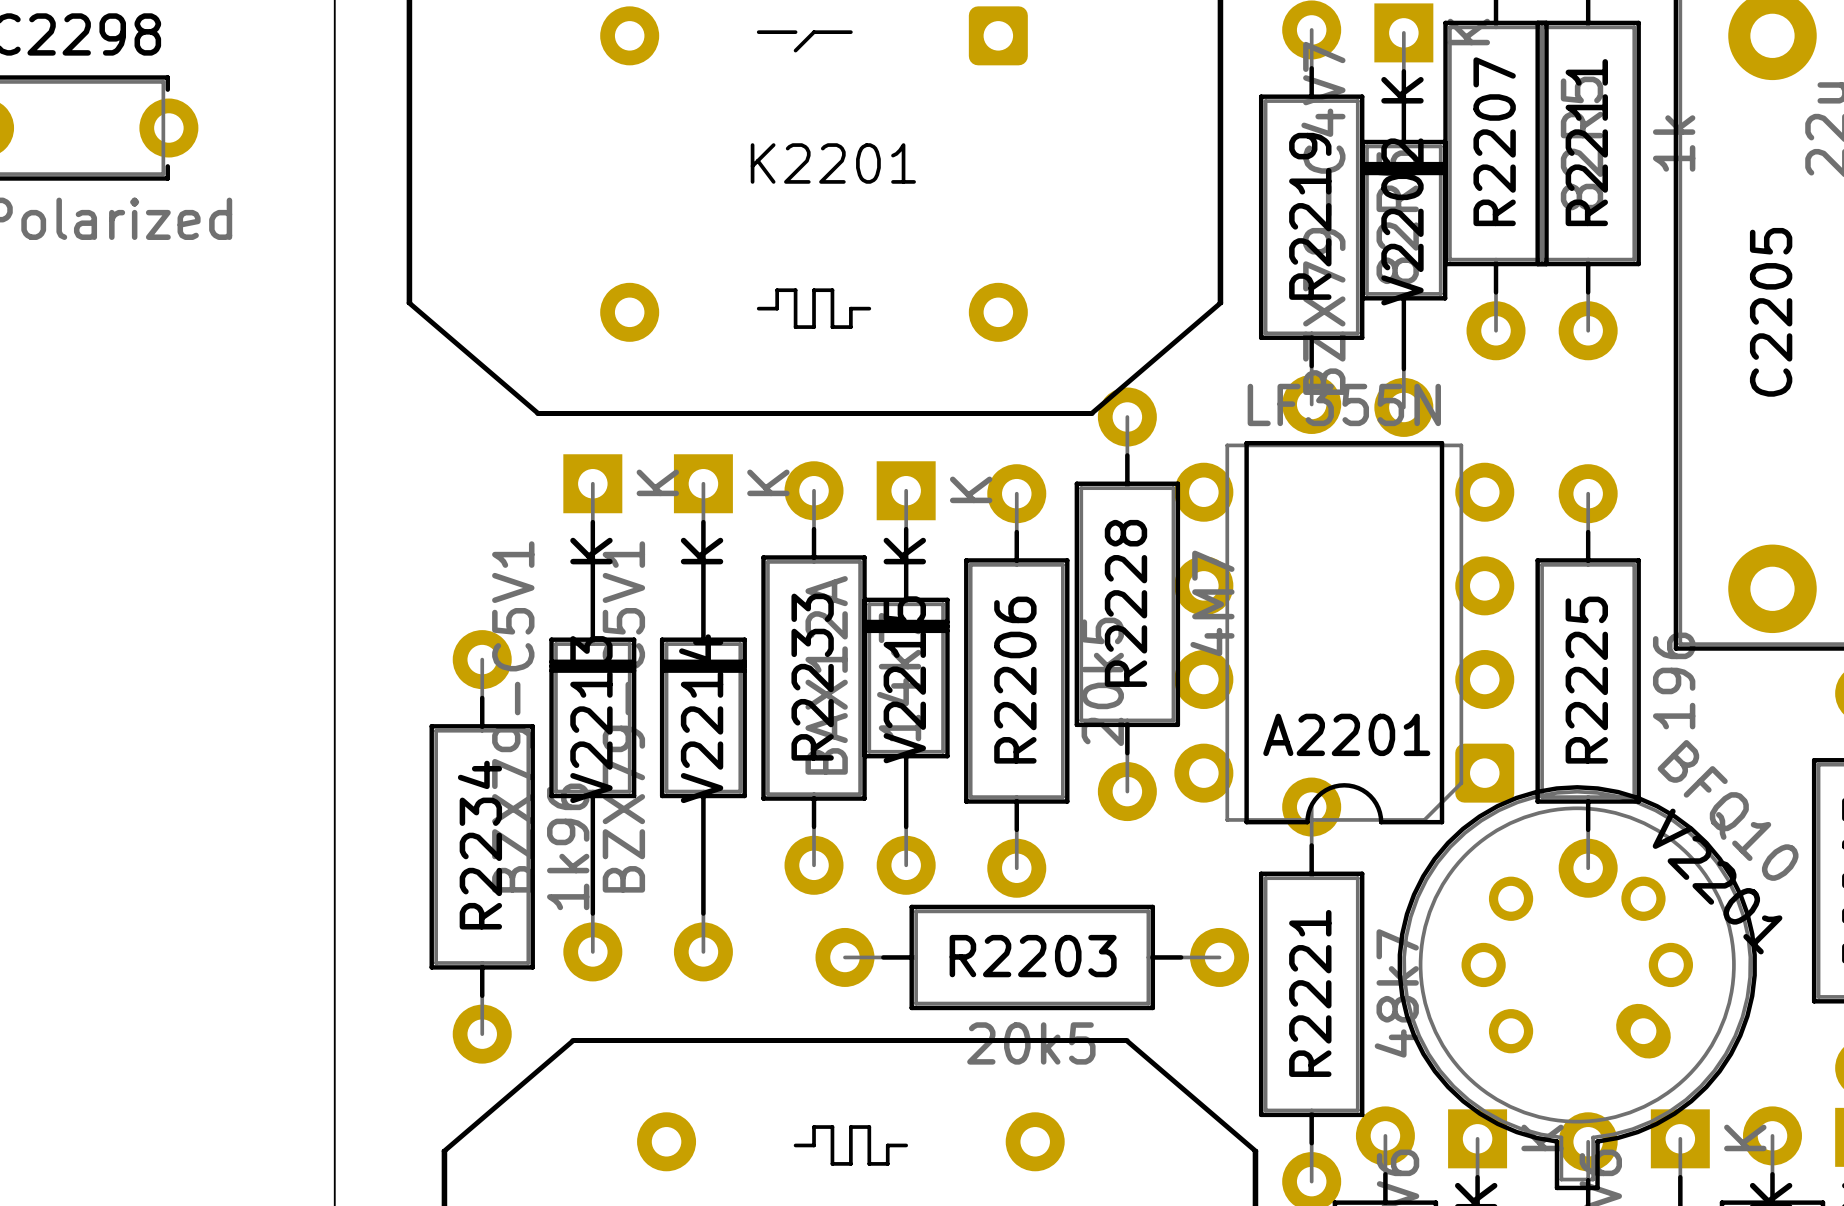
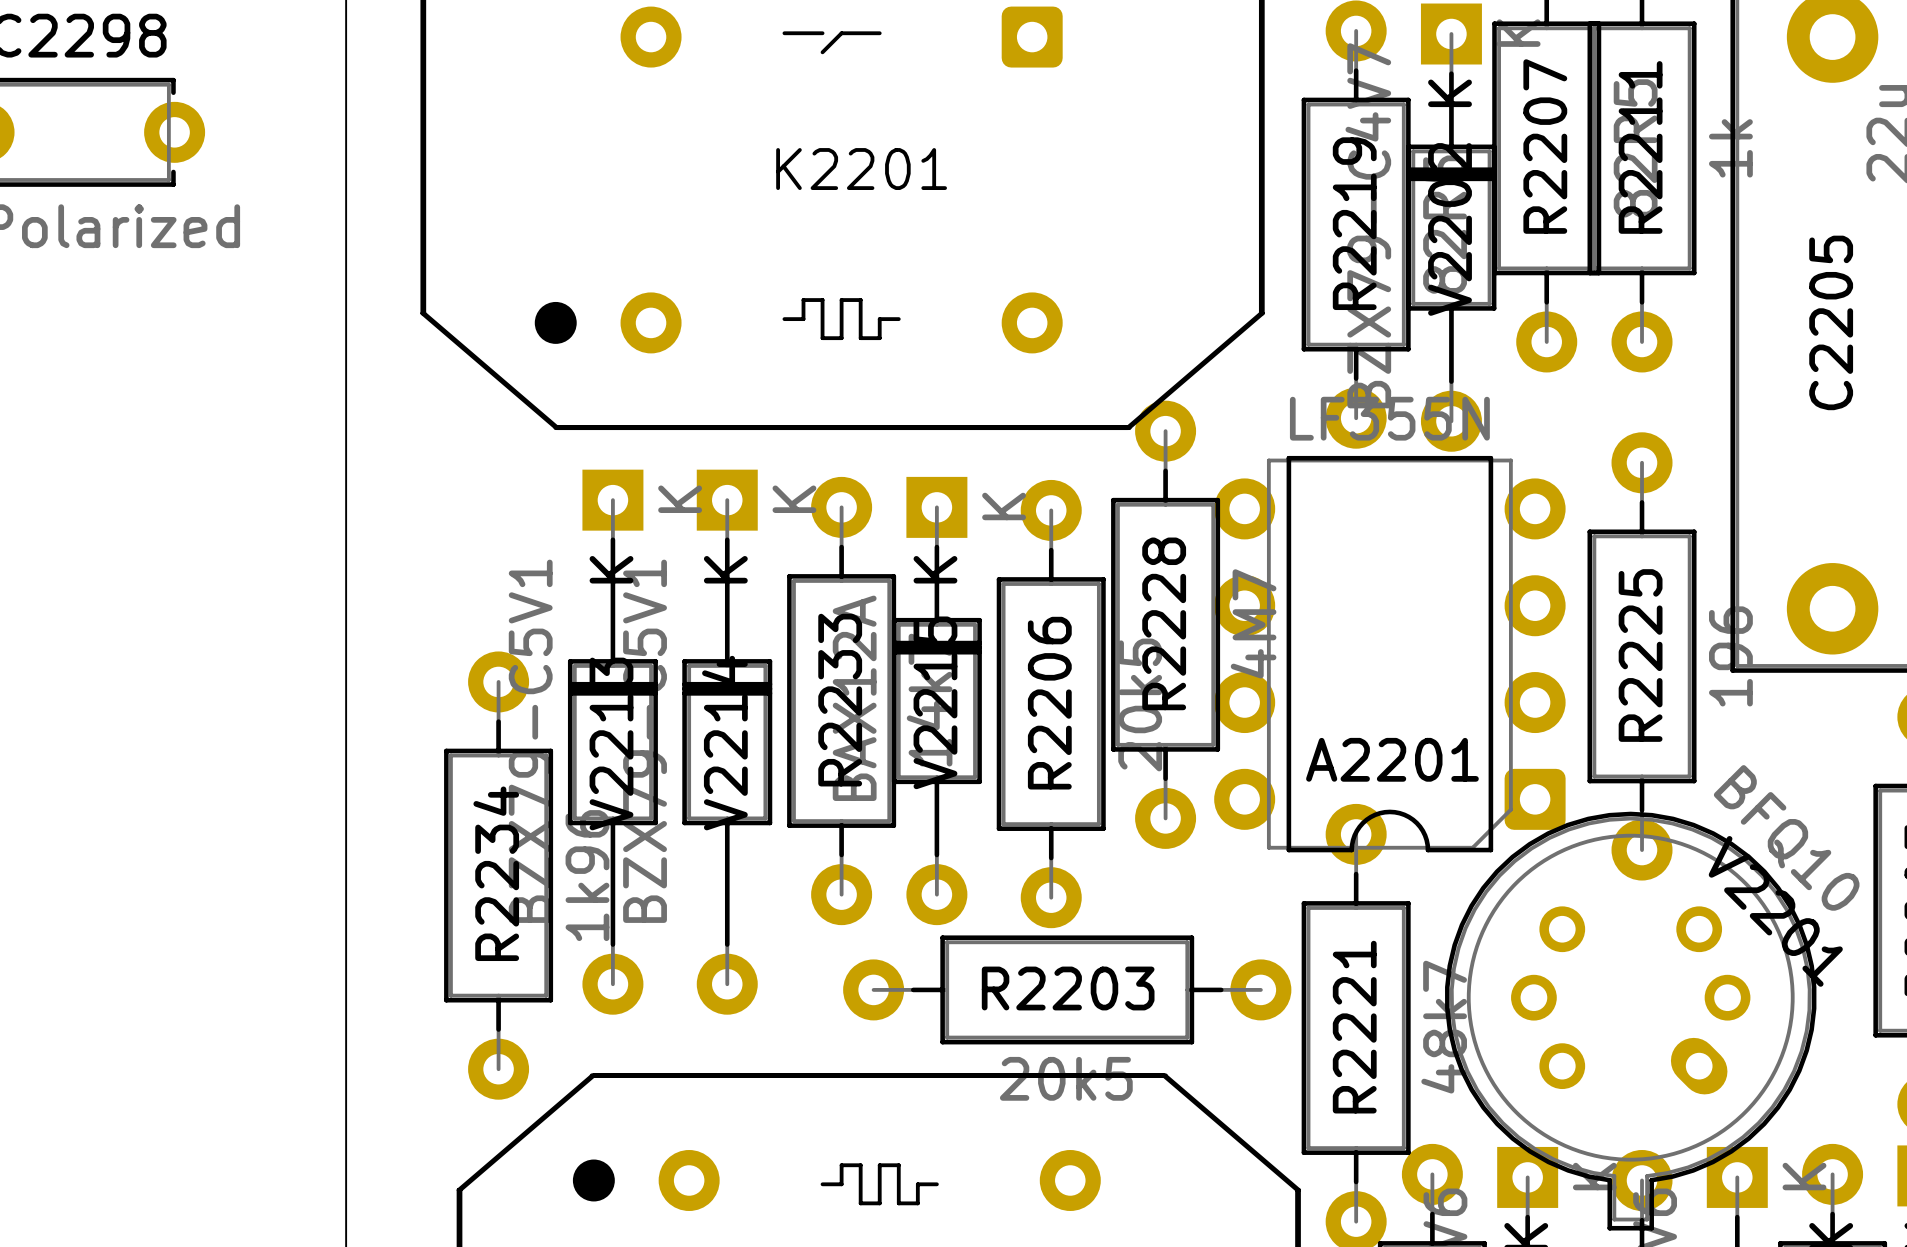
drawing: none -> [534, 301, 577, 344]
R2225 position: (1588, 680) -> (1642, 656)
drawing: none -> [572, 1159, 615, 1202]

